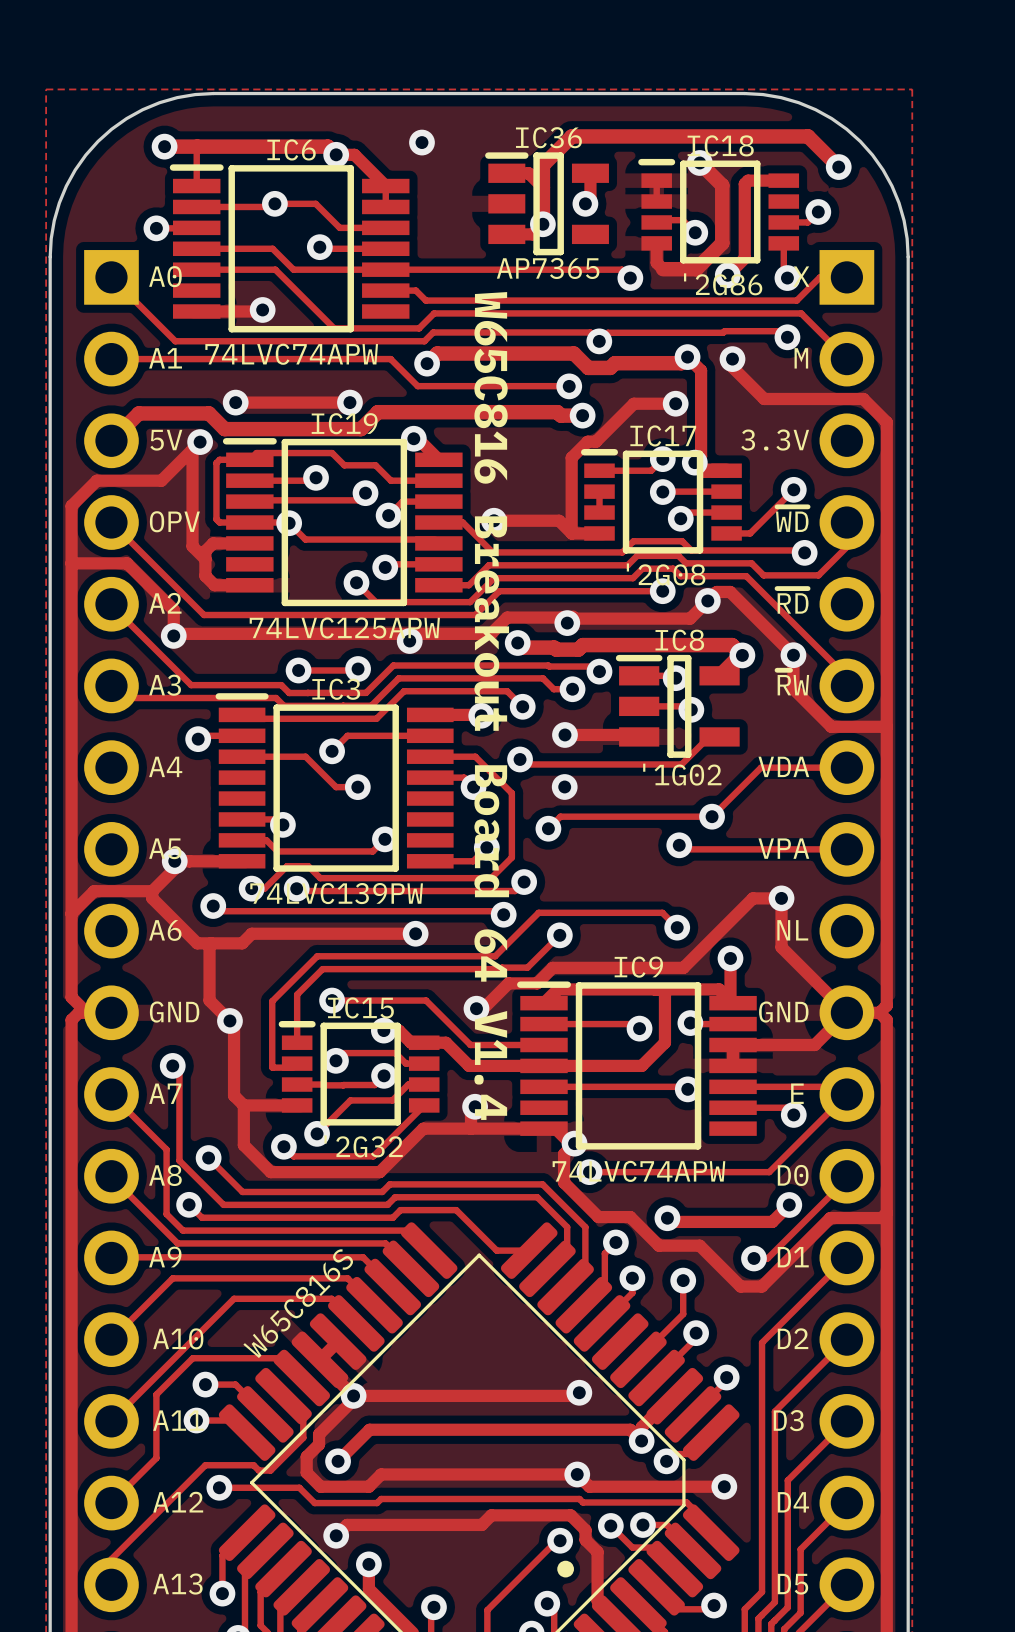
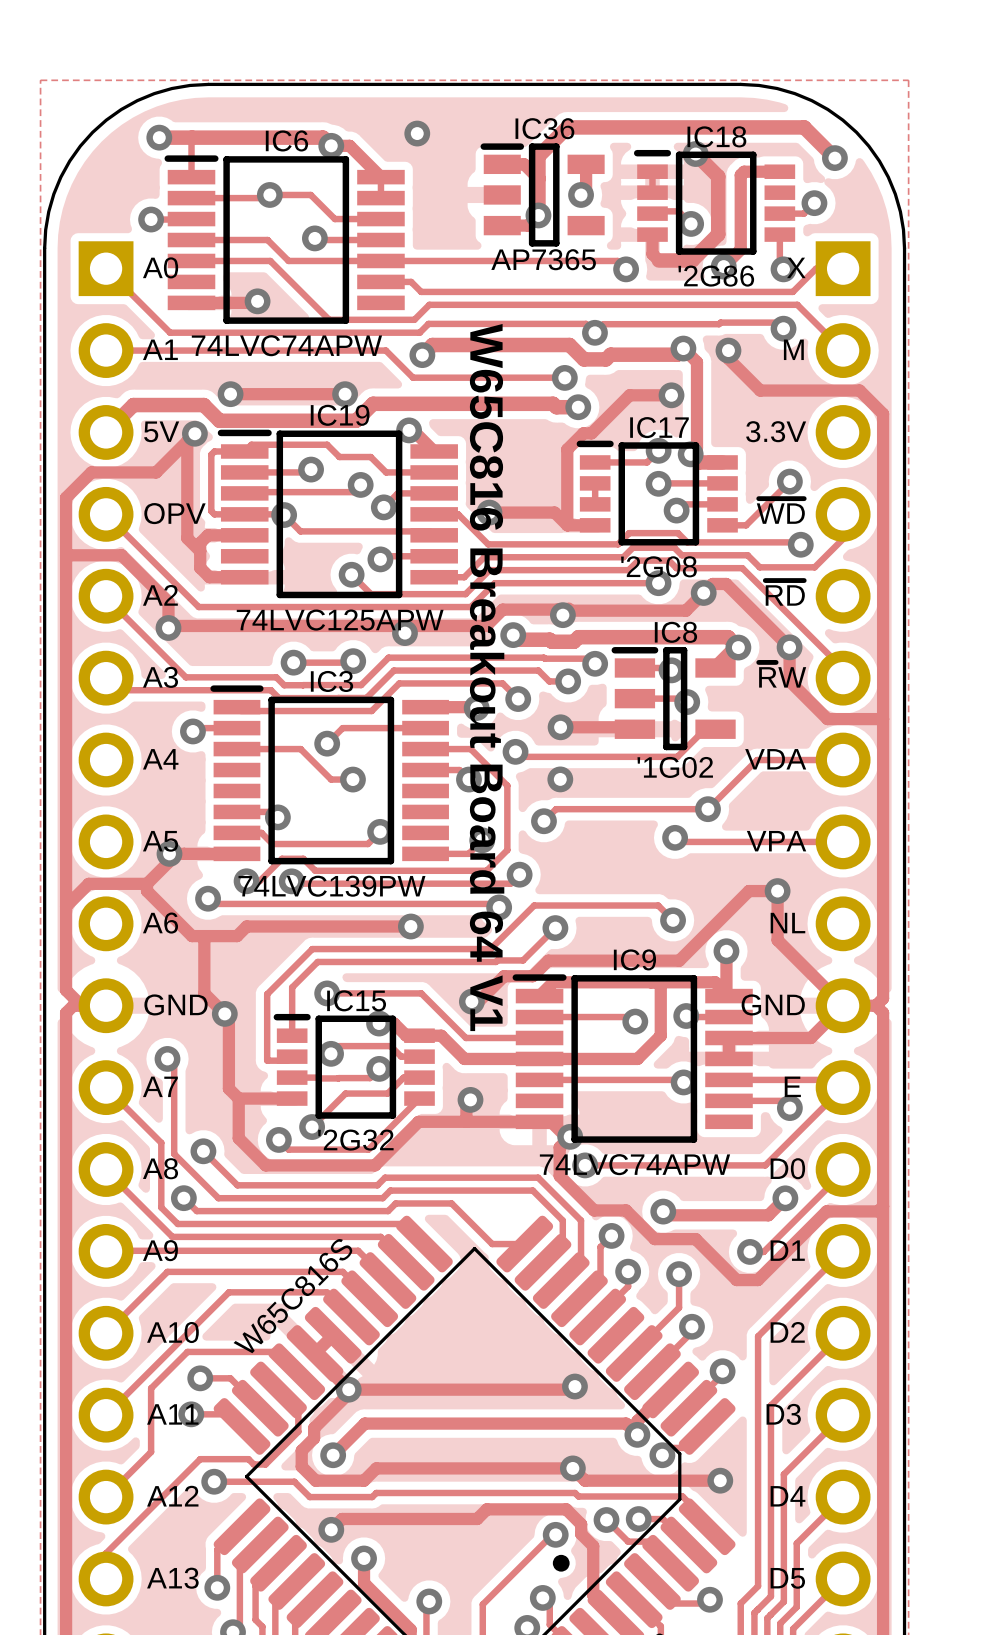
text: W65C816 Breakout Board 64 V1.4 (491, 706) -> W65C816 Breakout Board 64 V1 (487, 677)

